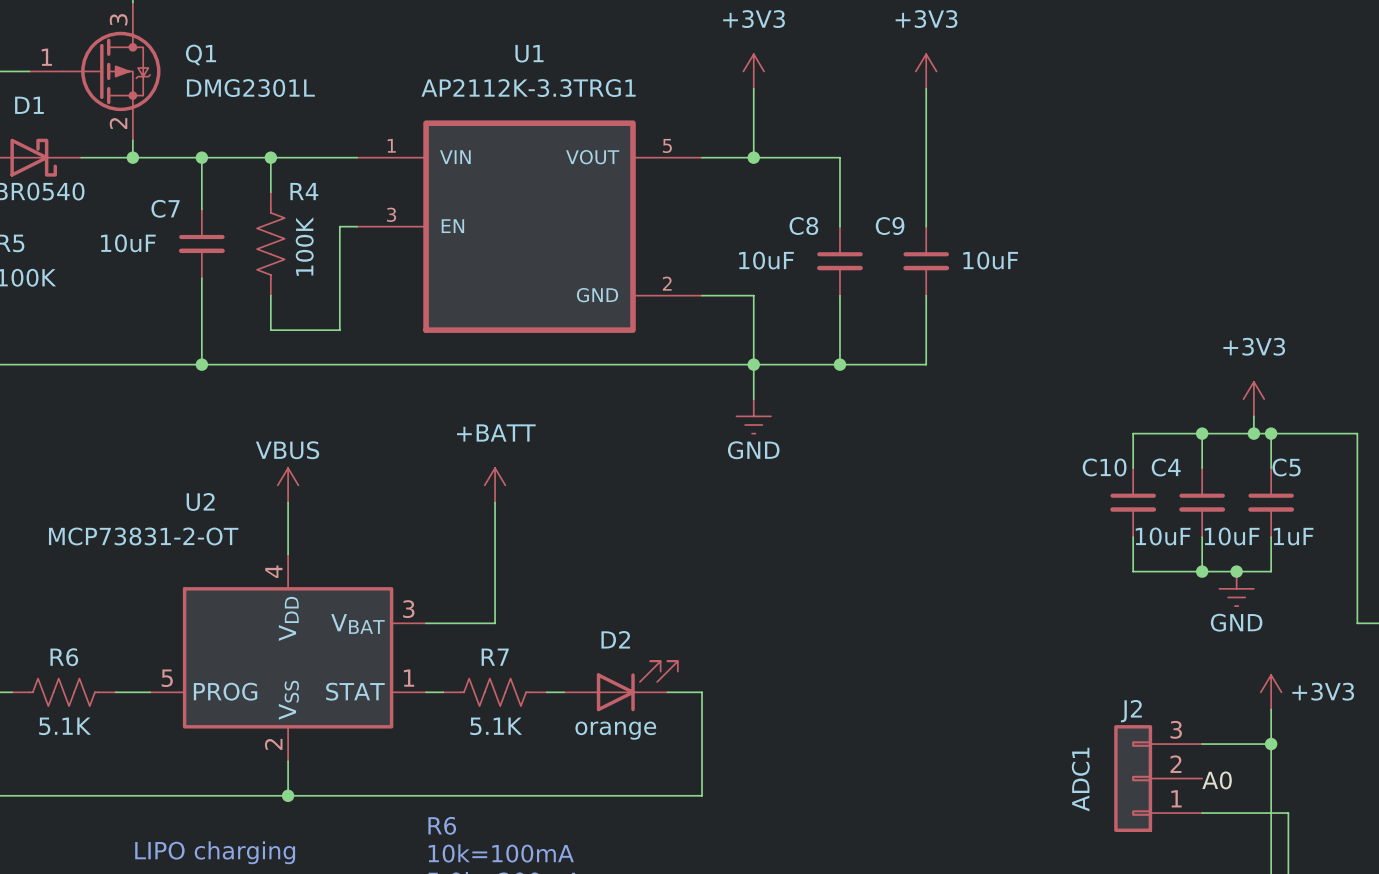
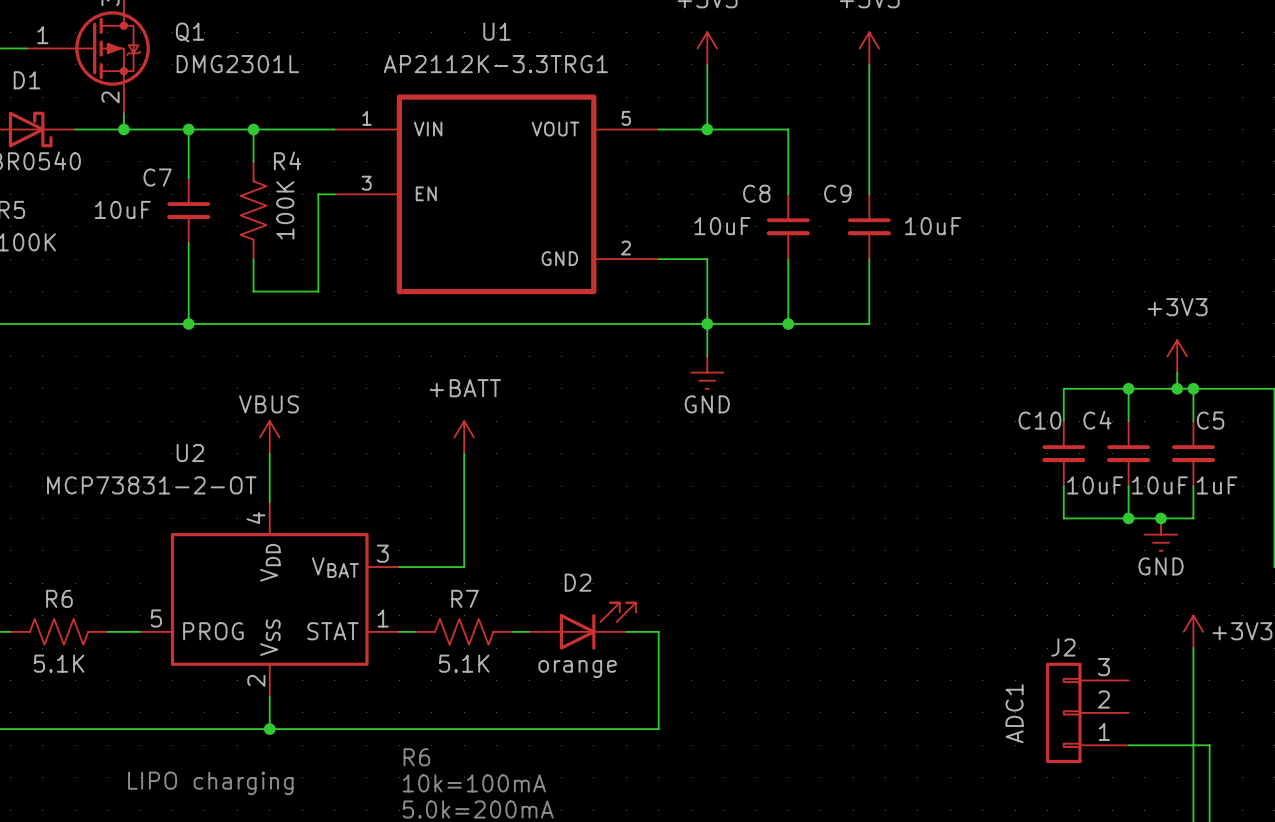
wire: (1202, 744) (1271, 744) -> none
junction: (1271, 744) -> none
label: A0 (1217, 780) -> none

